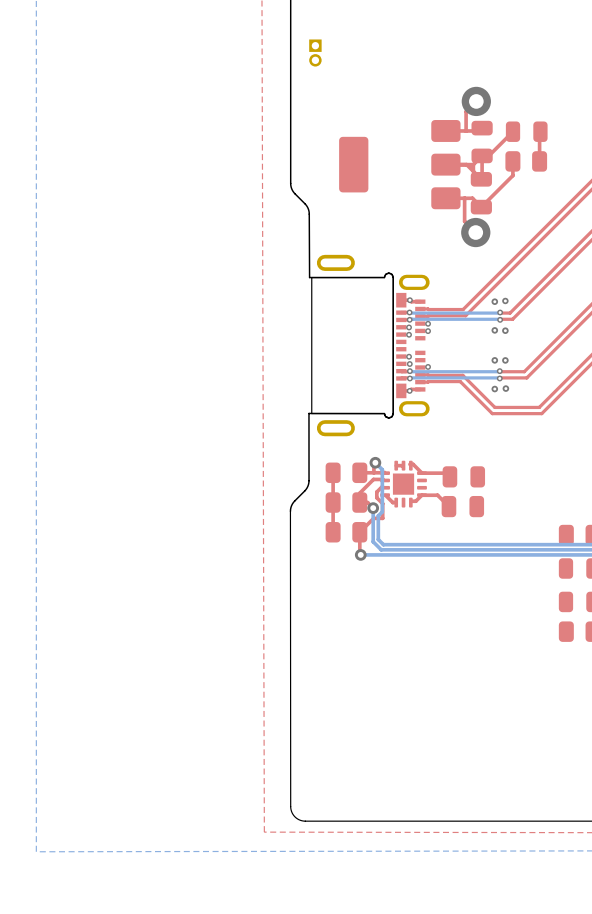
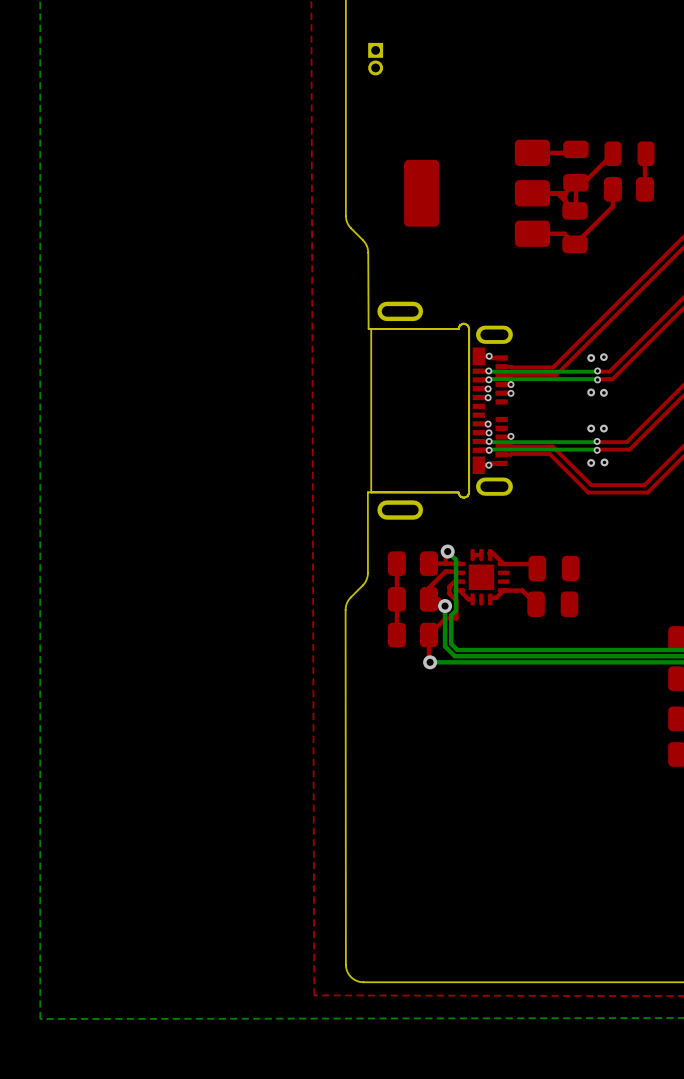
top track: (476, 101) (466, 111) (466, 130) -> none
via: (476, 101) -> none
top track: (464, 198) (464, 221) (475, 232) -> none
via: (475, 232) -> none

